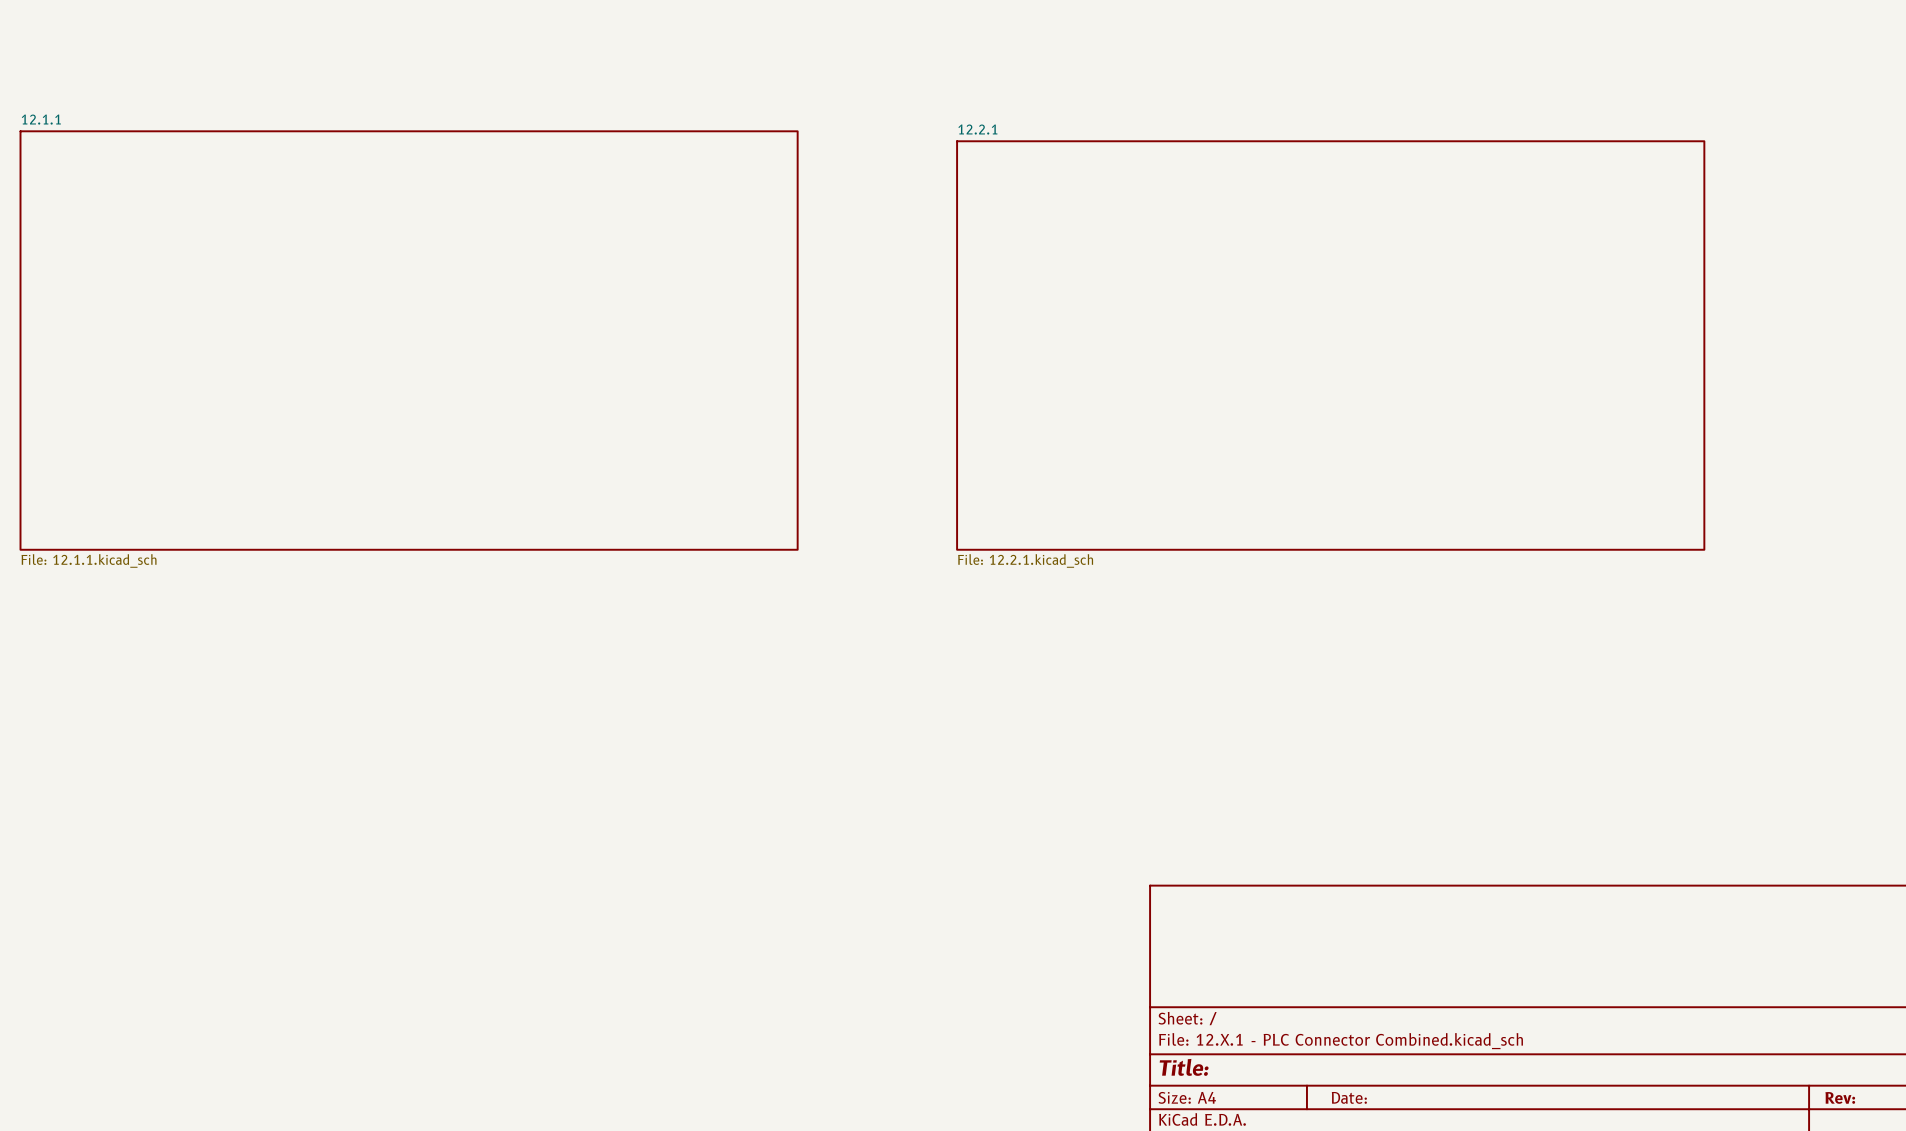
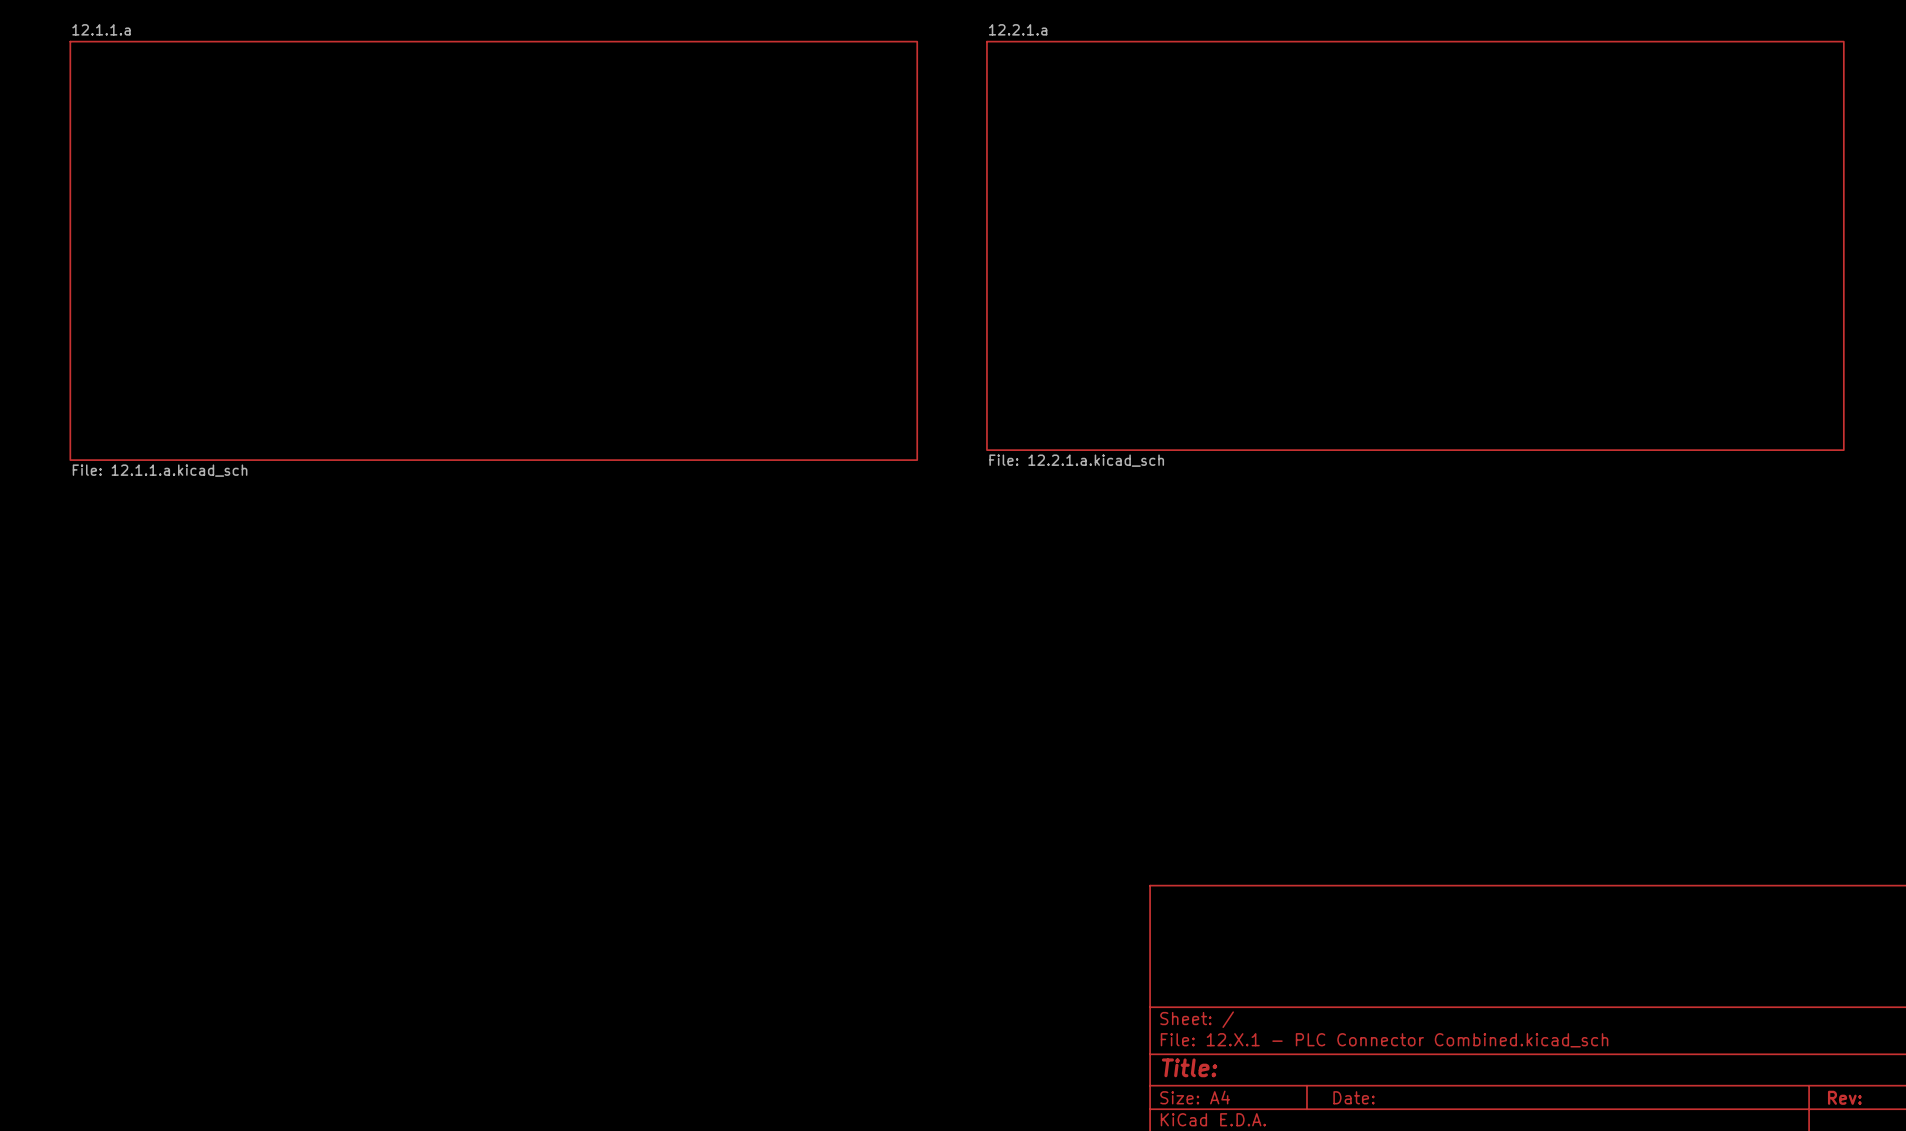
sheet 12.2.1.a: none -> File: 12.2.1.a.kicad_sch (1415, 245)
sheet 12.1.1.a: none -> File: 12.1.1.a.kicad_sch (493, 250)
sheet 12.1.1: File: 12.1.1.kicad_sch (409, 340) -> none
sheet 12.2.1: File: 12.2.1.kicad_sch (1330, 345) -> none

